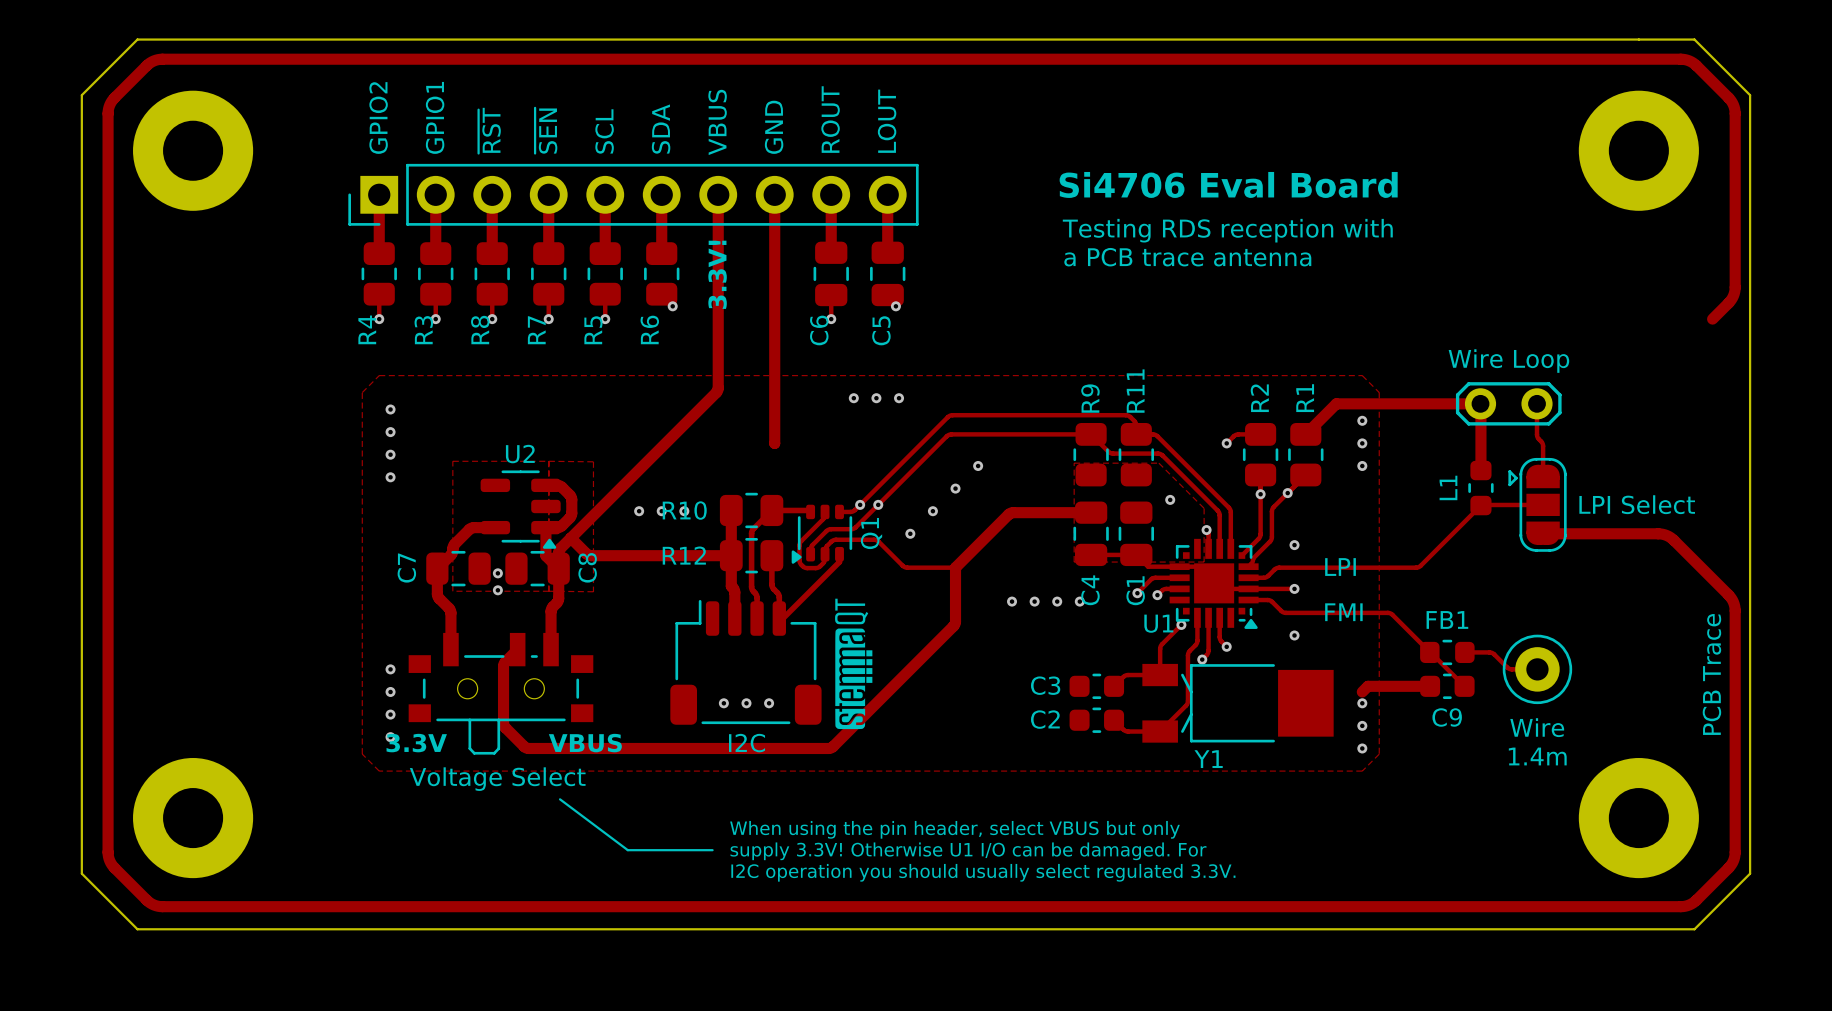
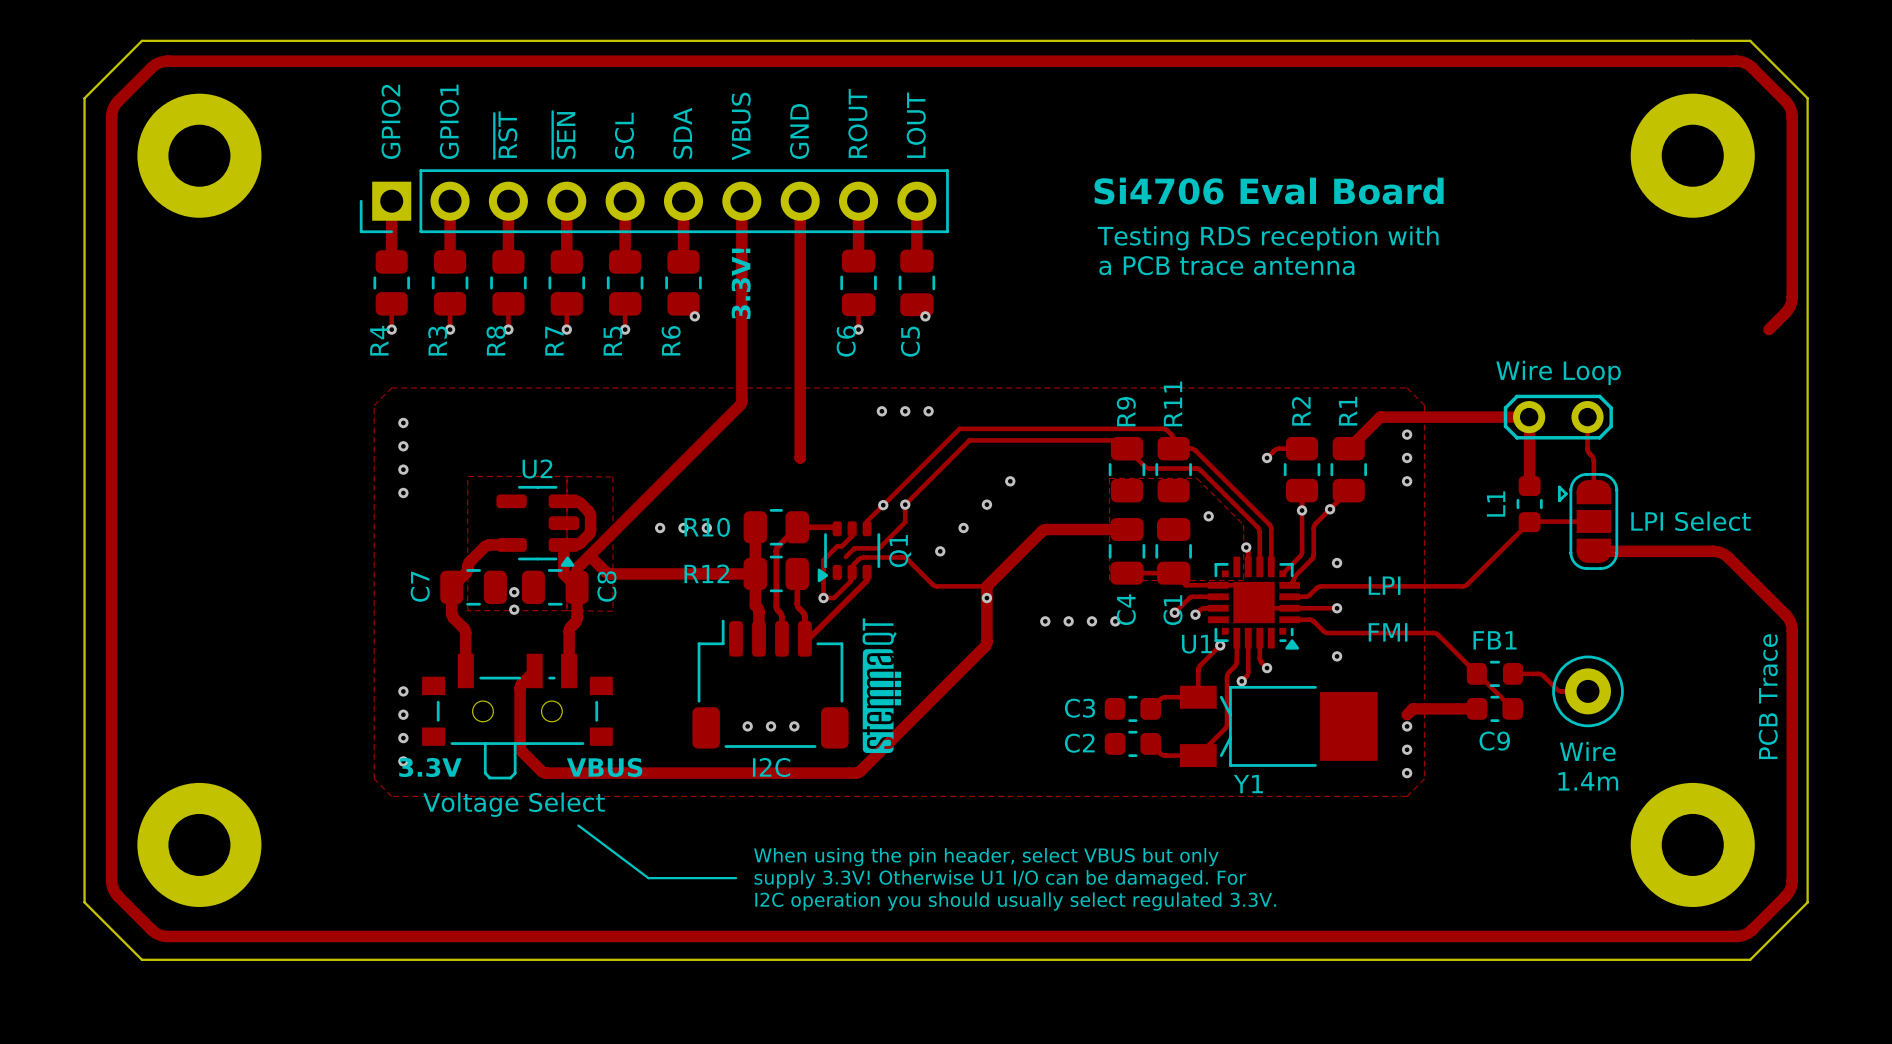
track: (952, 415) (938, 426) -> (983, 428) (959, 428) (867, 521) (867, 528)
track: (1091, 434) (948, 434) (855, 527) (828, 529) (812, 545) (810, 549) -> (1126, 448) (1118, 440) (969, 440)
track: (876, 488) (854, 510) (839, 511) -> (905, 504) (905, 522) (879, 548) (854, 548) (845, 556)
via: none -> (905, 504)
via: none -> (883, 505)
via: (860, 504) -> none
via: (878, 504) -> none
track: (825, 514) (823, 518) (799, 545) (799, 560) (801, 564) (806, 568) (820, 566) -> (852, 531) (852, 535) (841, 546) (837, 546) (823, 560) (823, 598) (834, 598) (847, 584)
via: none -> (823, 598)
via: none -> (986, 598)

